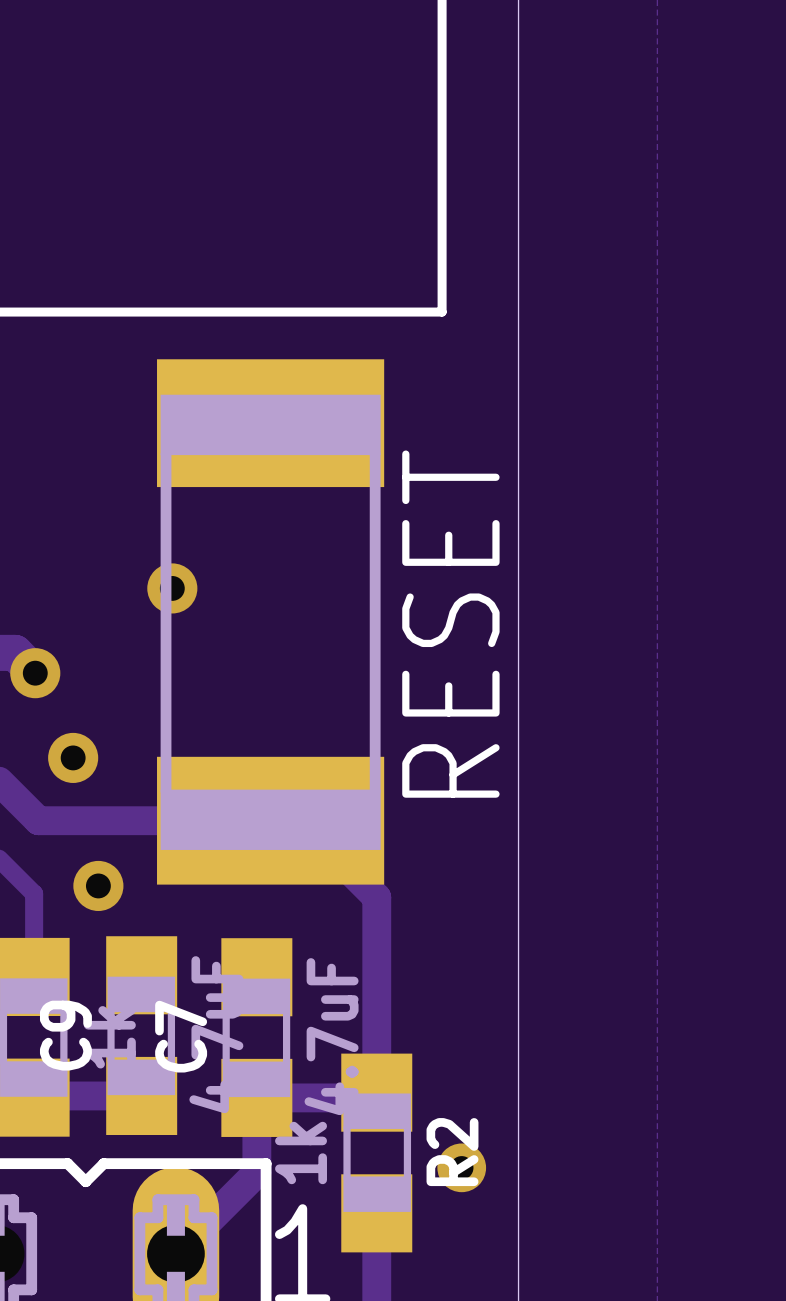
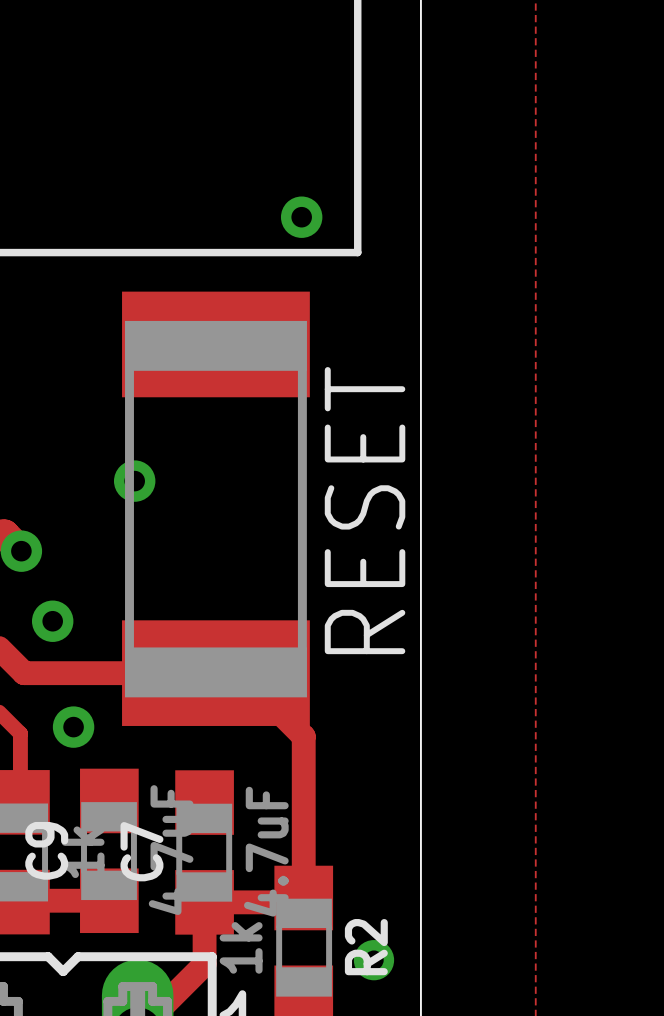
via: none -> (301, 217)

